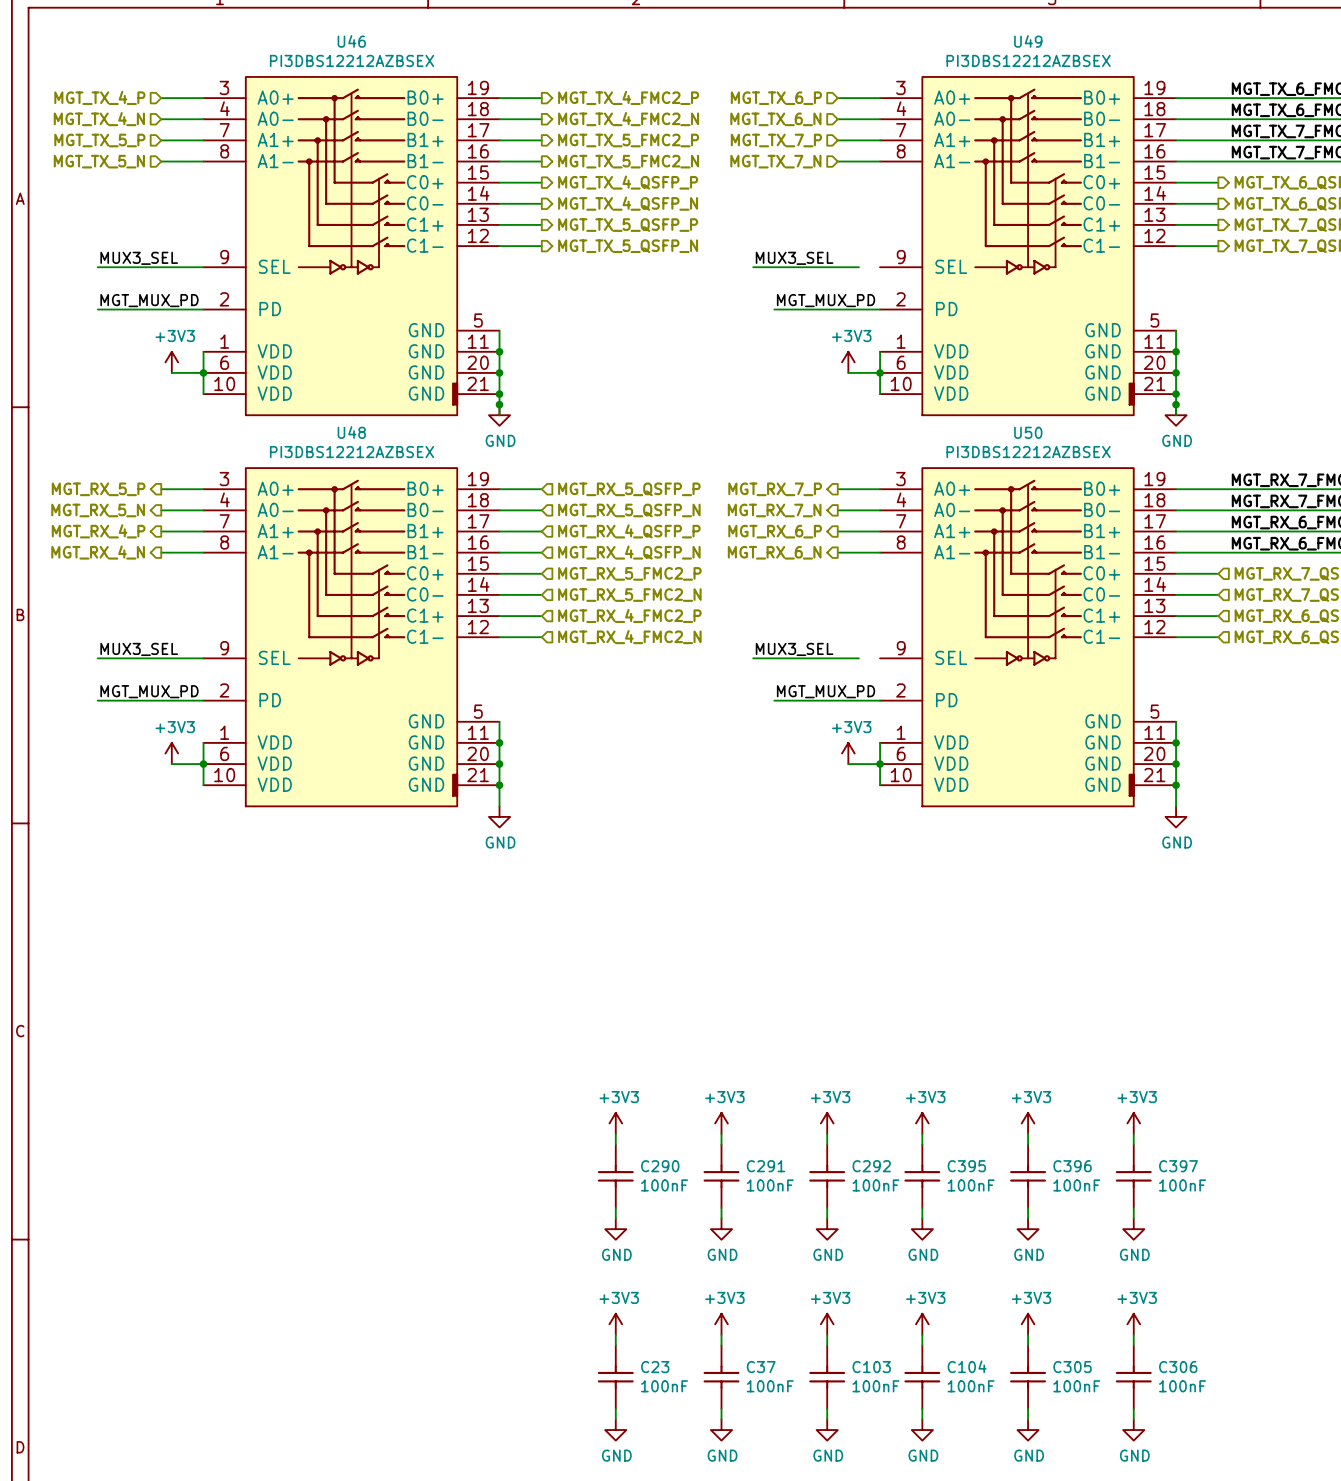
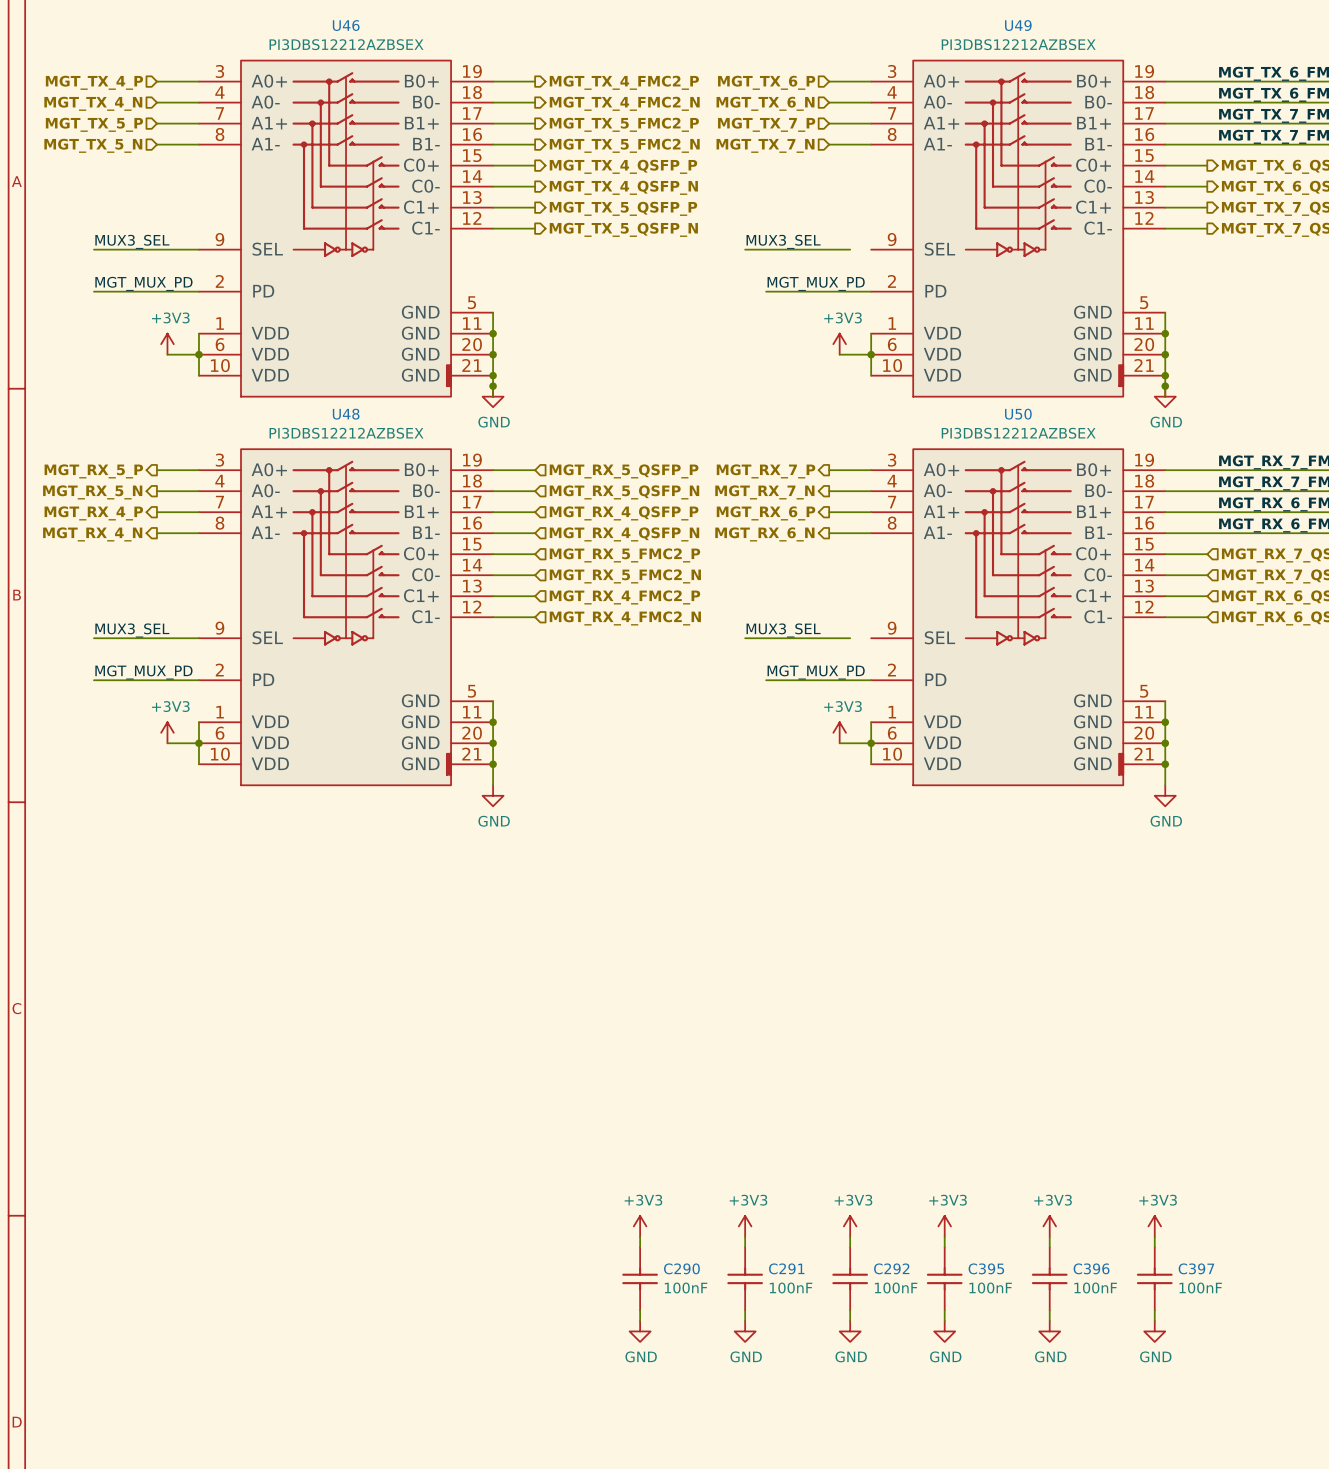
power symbol: +3V3 (615, 1123) -> none
power symbol: +3V3 (721, 1123) -> none
power symbol: +3V3 (827, 1123) -> none
power symbol: +3V3 (922, 1123) -> none
power symbol: +3V3 (1028, 1123) -> none
power symbol: +3V3 (1133, 1123) -> none
wire: (615, 1134) (615, 1144) -> none
wire: (721, 1134) (721, 1144) -> none
wire: (827, 1134) (827, 1144) -> none
wire: (922, 1134) (922, 1144) -> none
wire: (1028, 1134) (1028, 1144) -> none
wire: (1133, 1134) (1133, 1144) -> none
C290 position: (615, 1176) -> (640, 1278)
C291 position: (721, 1176) -> (745, 1278)
C292 position: (827, 1176) -> (850, 1278)
C395 position: (922, 1176) -> (944, 1278)
C396 position: (1028, 1176) -> (1049, 1278)
C397 position: (1133, 1176) -> (1154, 1278)
wire: (615, 1208) (615, 1218) -> none
wire: (721, 1208) (721, 1218) -> none
wire: (827, 1208) (827, 1218) -> none
wire: (922, 1208) (922, 1218) -> none
wire: (1028, 1208) (1028, 1218) -> none
wire: (1133, 1208) (1133, 1218) -> none
power symbol: GND (615, 1229) -> none
power symbol: GND (721, 1229) -> none
power symbol: GND (827, 1229) -> none
power symbol: GND (922, 1229) -> none
power symbol: GND (1028, 1229) -> none
power symbol: GND (1133, 1229) -> none
power symbol: none -> +3V3 (640, 1226)
power symbol: none -> +3V3 (745, 1226)
power symbol: none -> +3V3 (850, 1226)
power symbol: none -> +3V3 (944, 1226)
power symbol: none -> +3V3 (1049, 1226)
power symbol: none -> +3V3 (1154, 1226)
power symbol: +3V3 (615, 1324) -> none
power symbol: +3V3 (721, 1324) -> none
power symbol: +3V3 (827, 1324) -> none
power symbol: +3V3 (922, 1324) -> none
power symbol: +3V3 (1028, 1324) -> none
power symbol: +3V3 (1133, 1324) -> none
wire: (615, 1334) (615, 1345) -> (640, 1236) (640, 1247)
wire: (721, 1334) (721, 1345) -> (745, 1236) (745, 1247)
wire: (827, 1334) (827, 1345) -> (850, 1236) (850, 1247)
wire: (922, 1334) (922, 1345) -> (944, 1236) (944, 1247)
wire: (1028, 1334) (1028, 1345) -> (1049, 1236) (1049, 1247)
wire: (1133, 1334) (1133, 1345) -> (1154, 1236) (1154, 1247)
power symbol: none -> GND (640, 1331)
power symbol: none -> GND (745, 1331)
power symbol: none -> GND (850, 1331)
power symbol: none -> GND (944, 1331)
power symbol: none -> GND (1049, 1331)
power symbol: none -> GND (1154, 1331)
C23: (615, 1377) -> none
C37: (721, 1377) -> none
C103: (827, 1377) -> none
C104: (922, 1377) -> none
C305: (1028, 1377) -> none
C306: (1133, 1377) -> none
wire: (615, 1408) (615, 1419) -> (640, 1310) (640, 1320)
wire: (721, 1408) (721, 1419) -> (745, 1310) (745, 1320)
wire: (827, 1408) (827, 1419) -> (850, 1310) (850, 1320)
wire: (922, 1408) (922, 1419) -> (944, 1310) (944, 1320)
wire: (1028, 1408) (1028, 1419) -> (1049, 1310) (1049, 1320)
wire: (1133, 1408) (1133, 1419) -> (1154, 1310) (1154, 1320)
power symbol: GND (615, 1430) -> none
power symbol: GND (721, 1430) -> none
power symbol: GND (827, 1430) -> none
power symbol: GND (922, 1430) -> none
power symbol: GND (1028, 1430) -> none
power symbol: GND (1133, 1430) -> none

